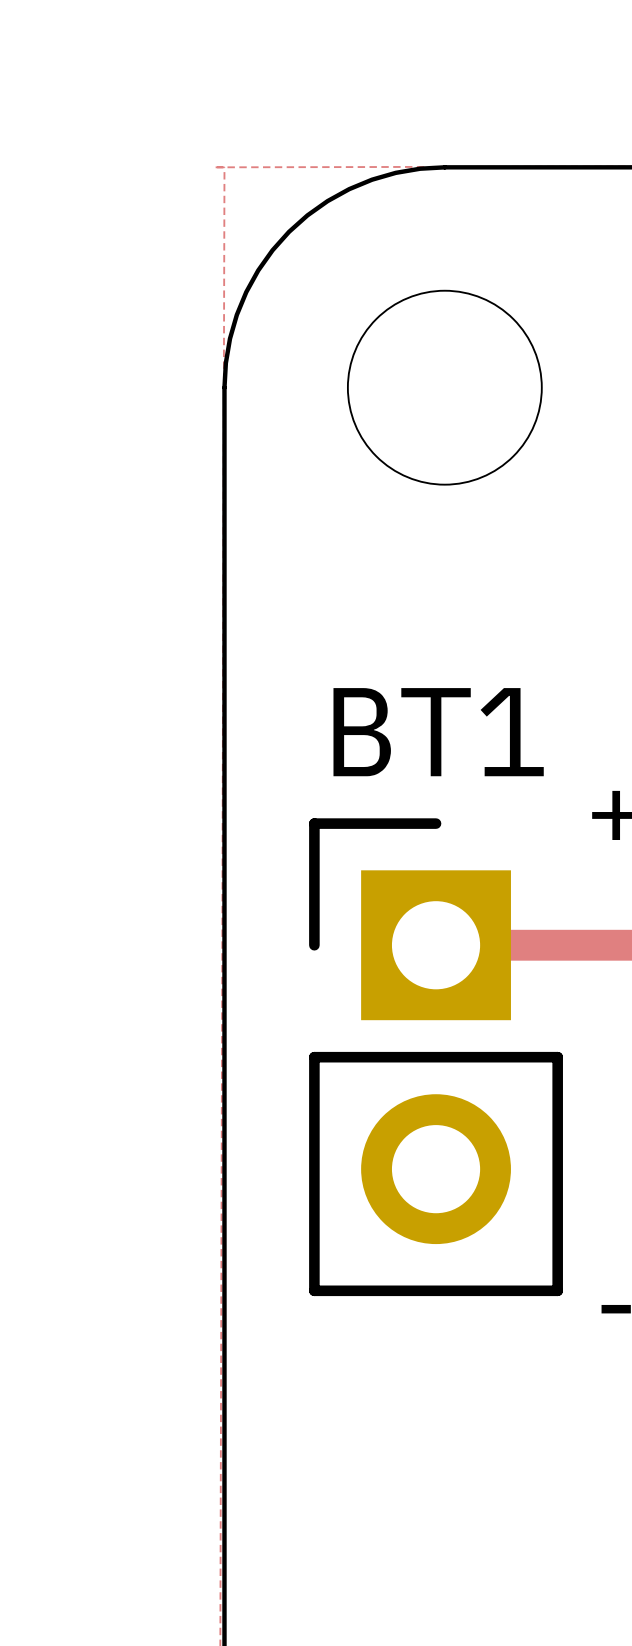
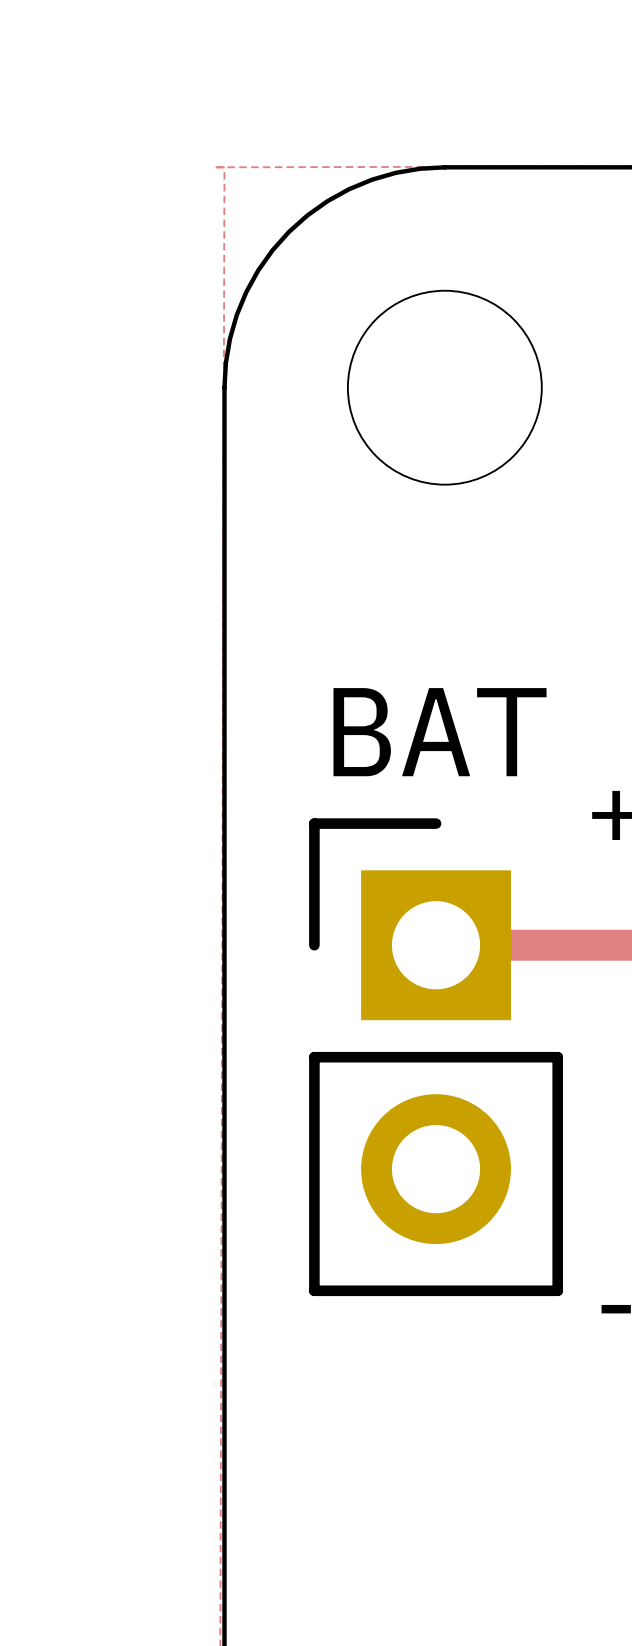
BT1 name: BT1 (438, 732) -> BAT (440, 732)

